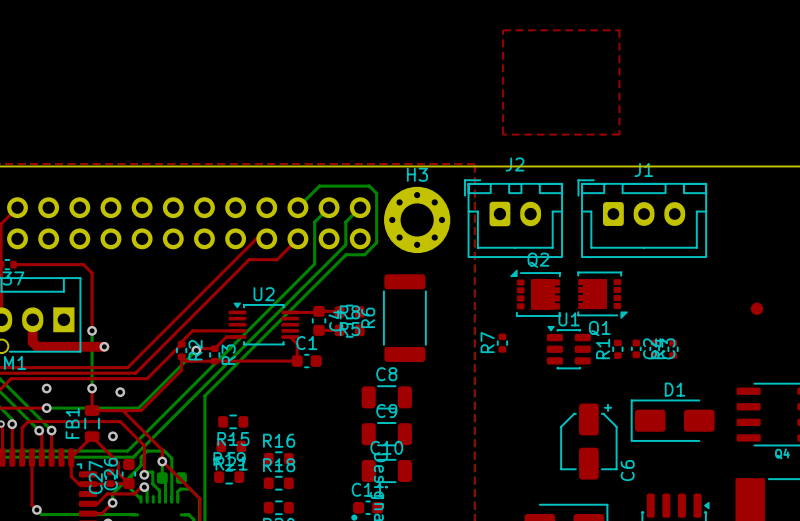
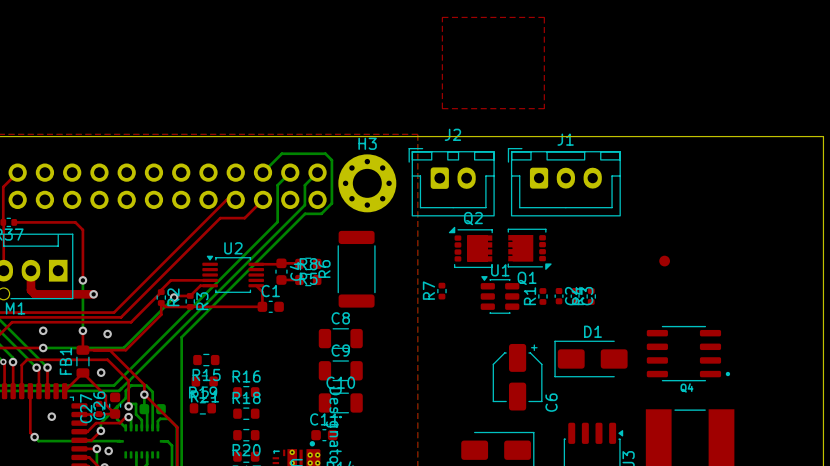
top track: (71, 457) (71, 476) (78, 484) (88, 484) -> none
via: none -> (51, 416)

